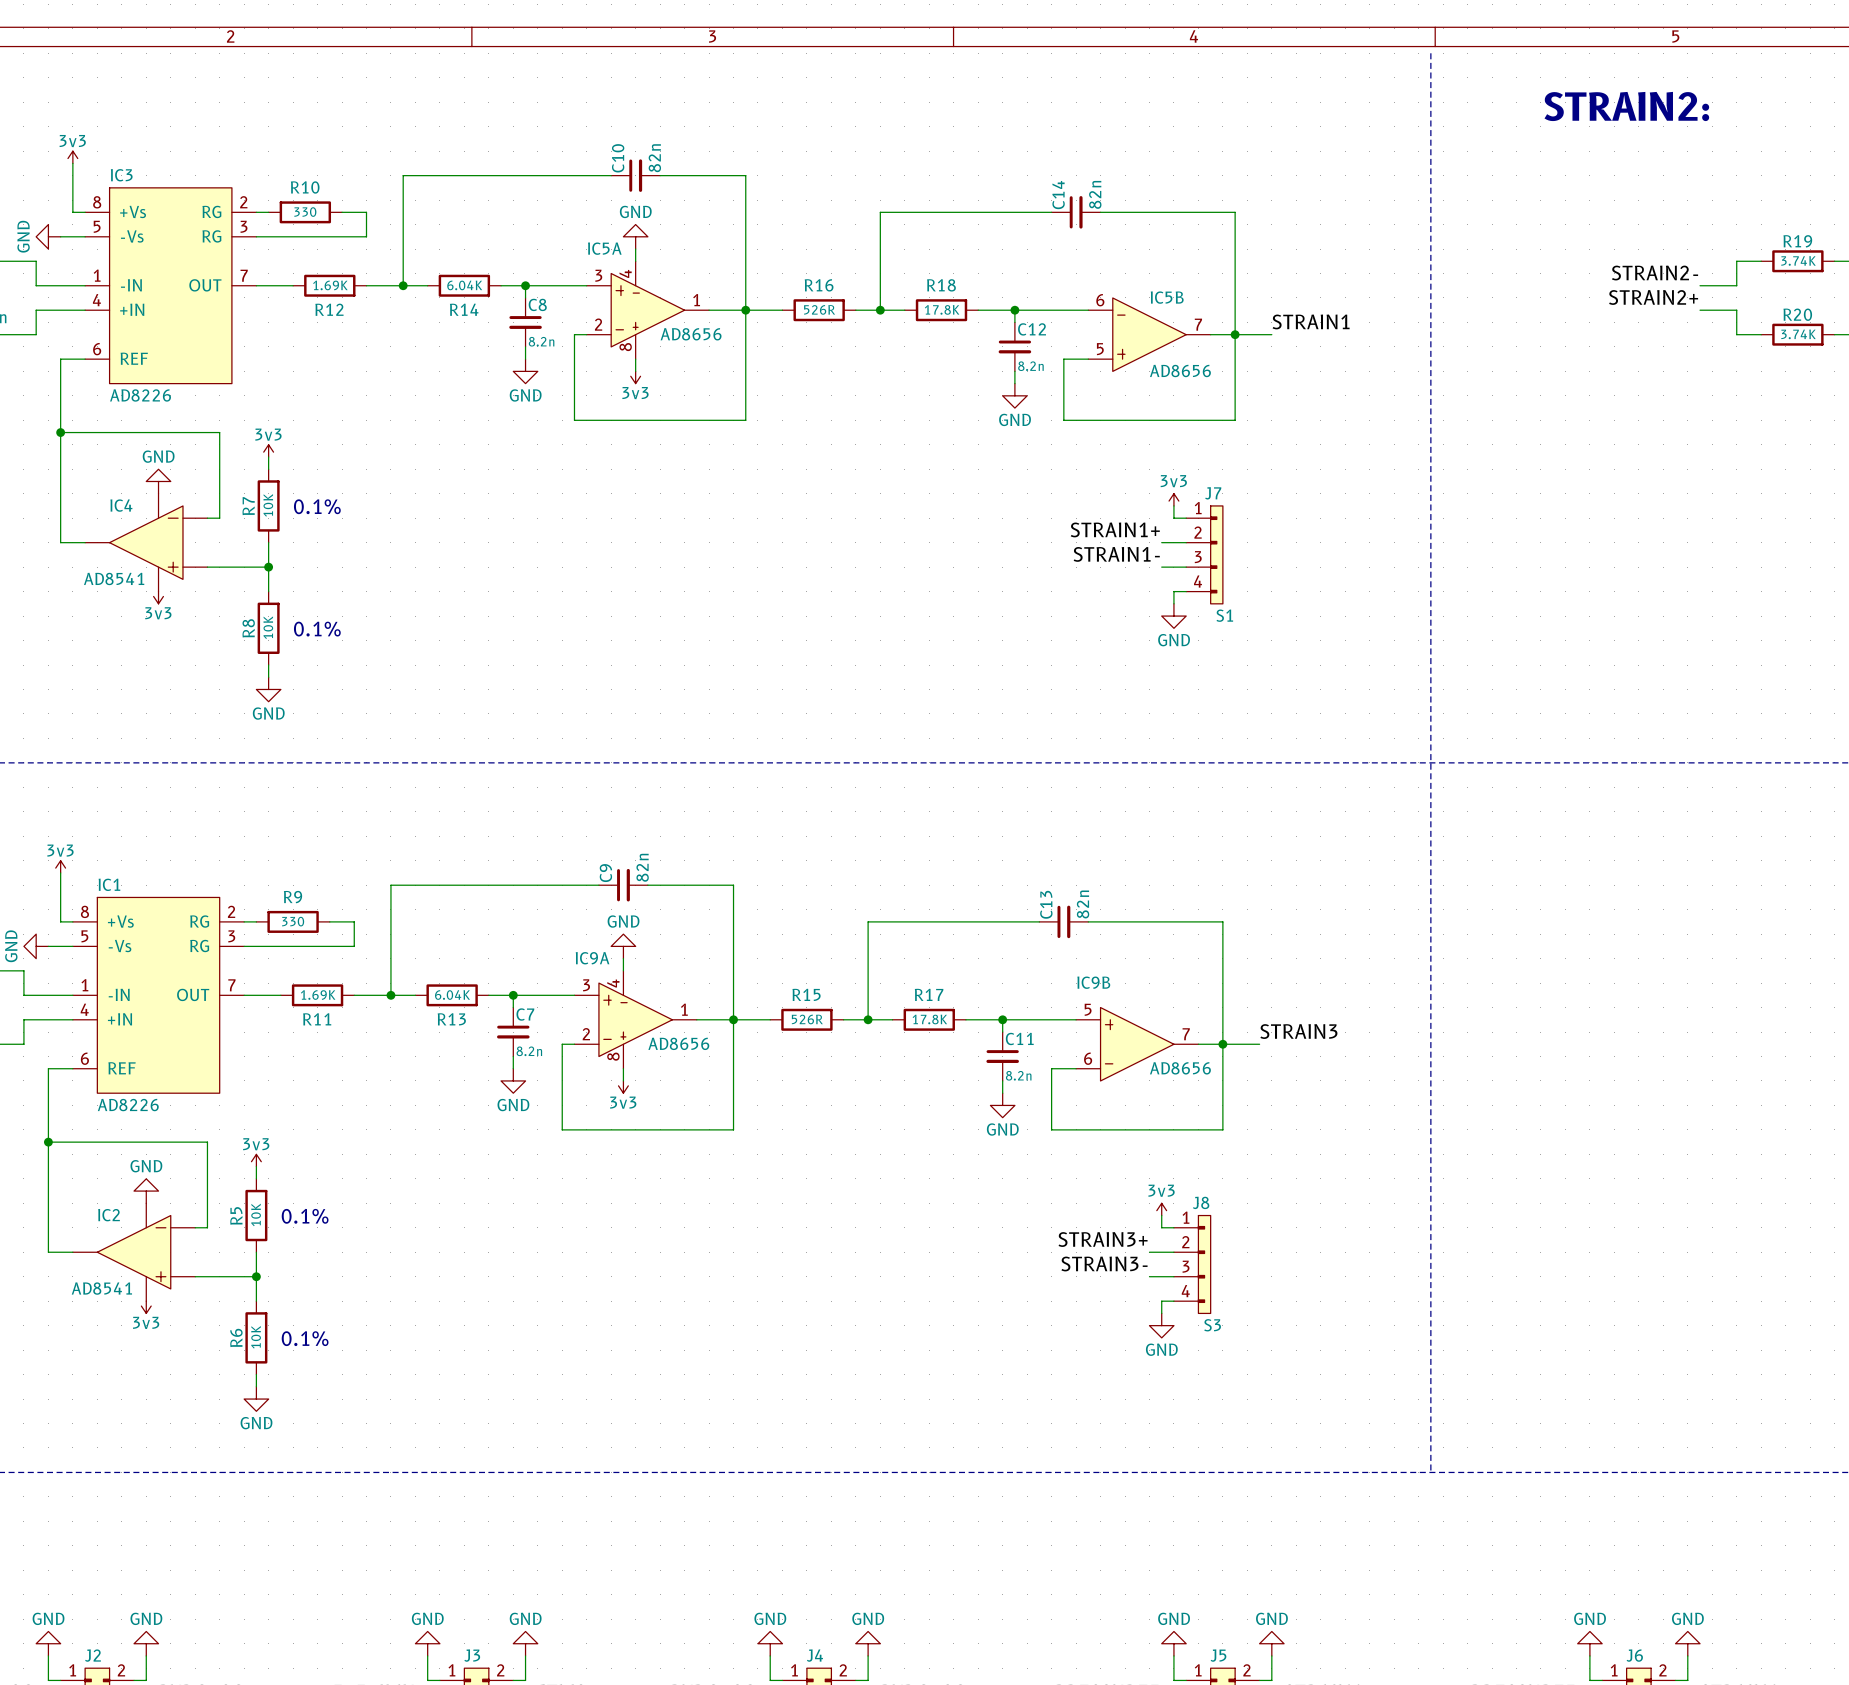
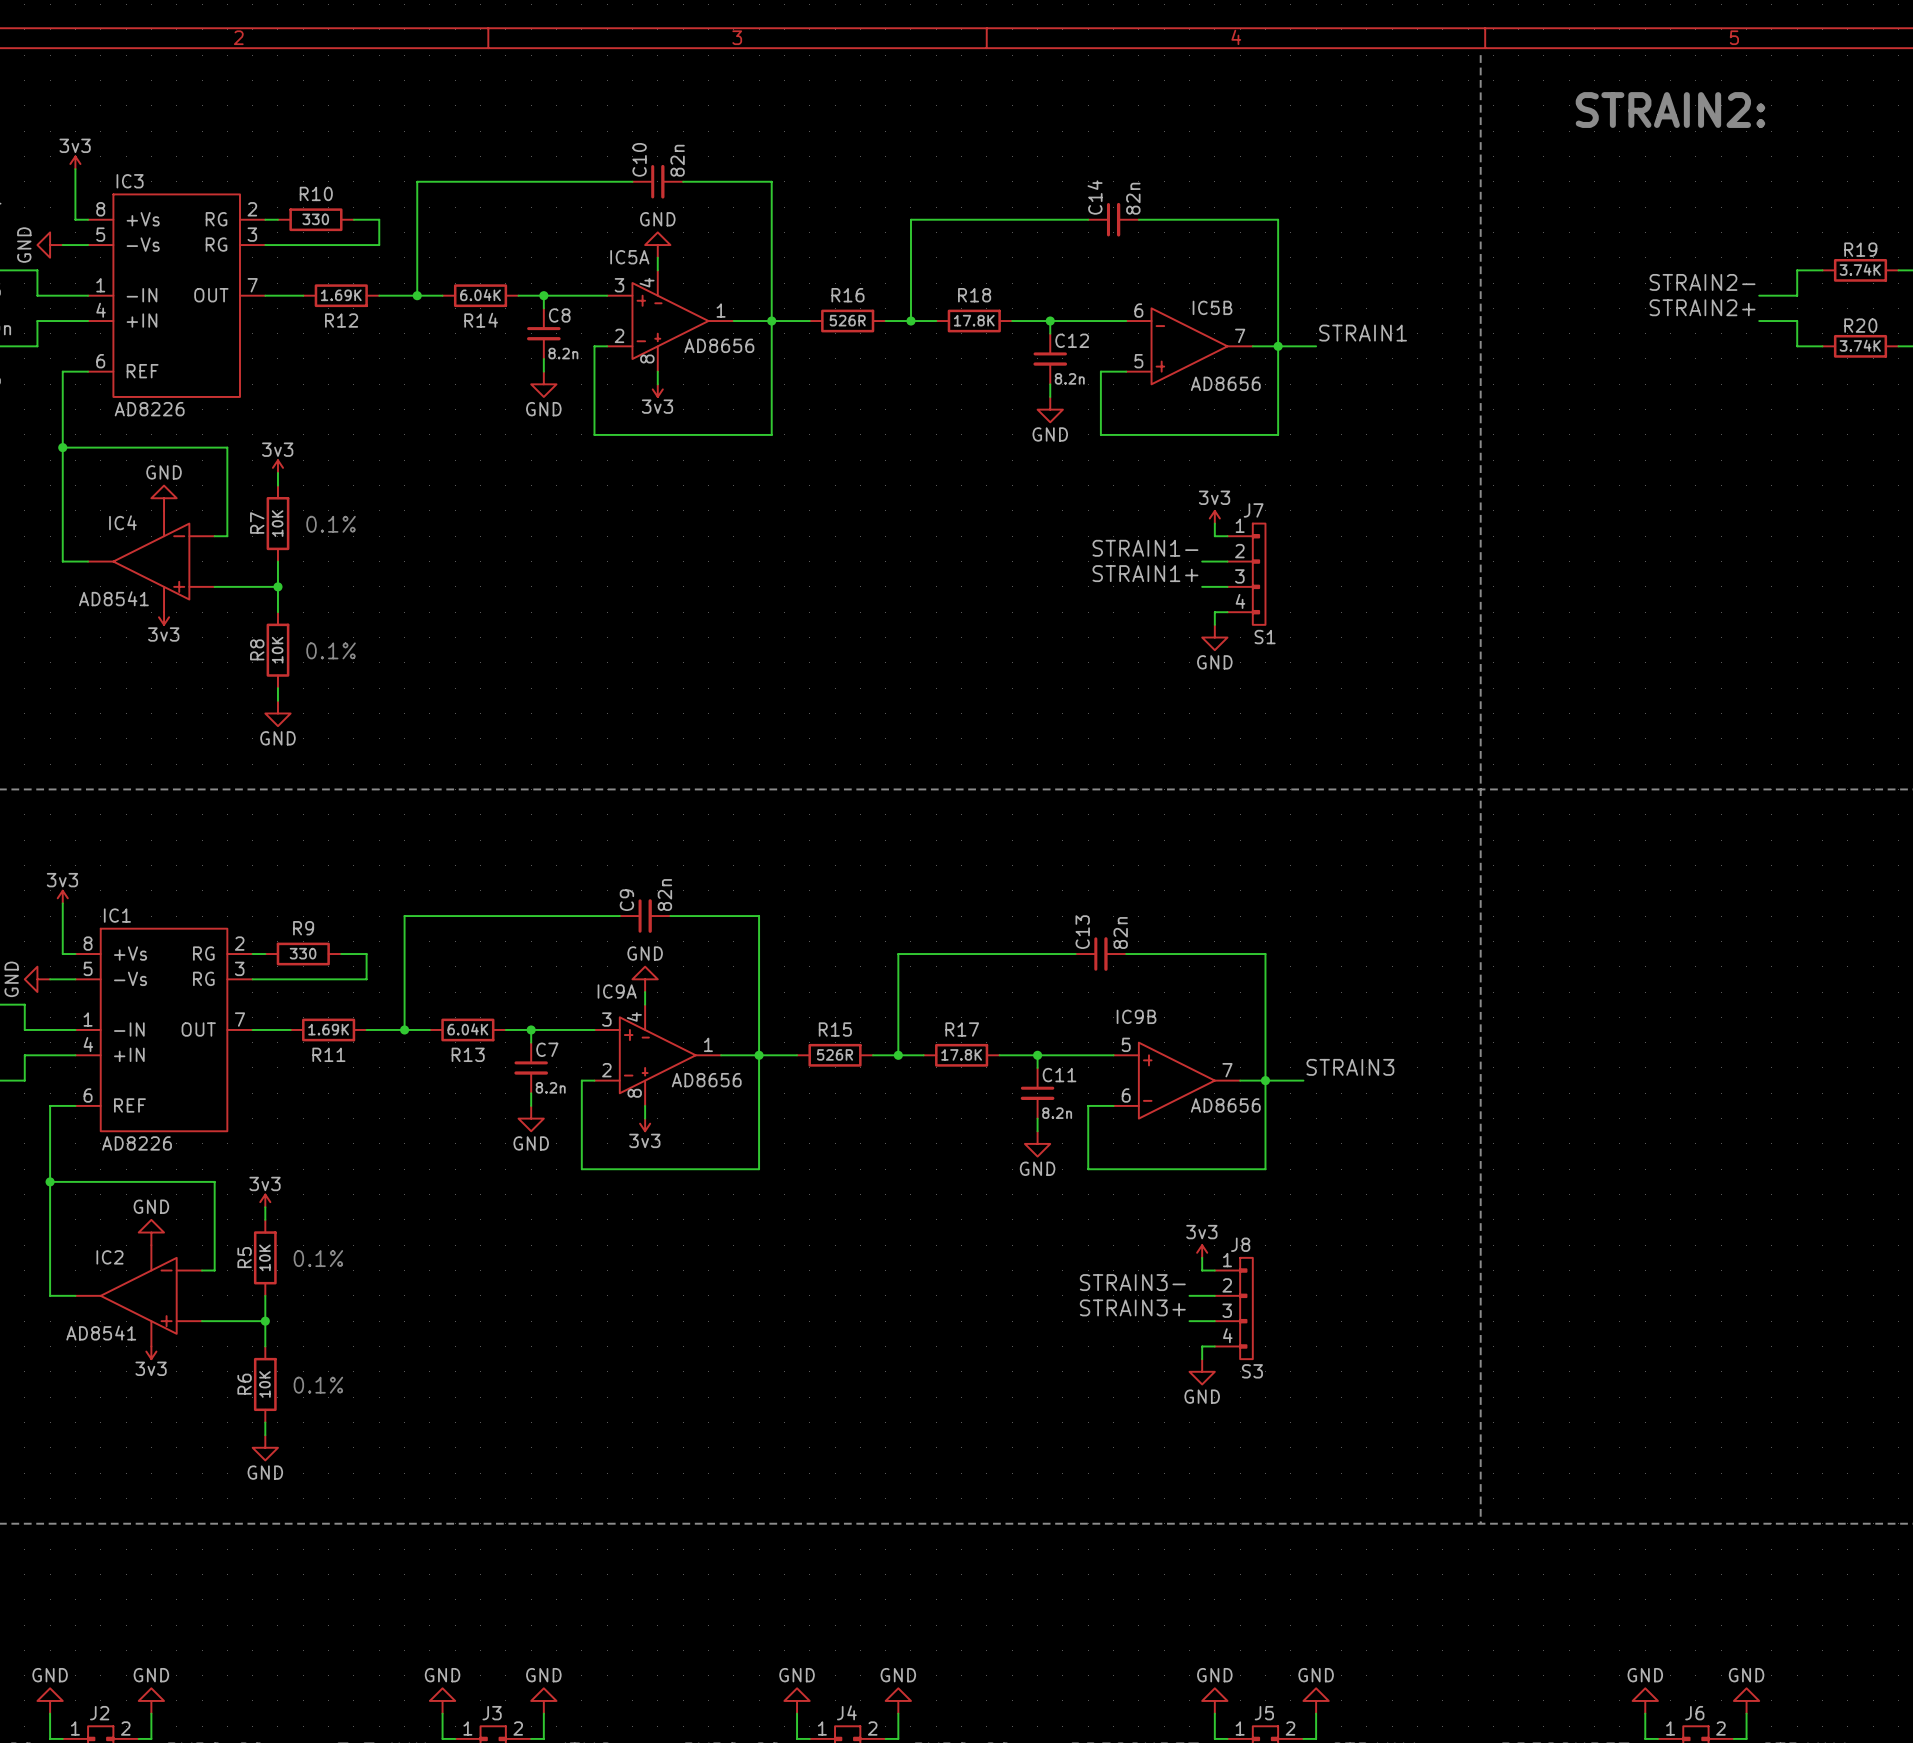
label: STRAIN1+ (1115, 529) -> STRAIN1- (1145, 548)
label: STRAIN1- (1116, 554) -> STRAIN1+ (1145, 573)
label: STRAIN3+ (1103, 1239) -> STRAIN3- (1132, 1282)
label: STRAIN3- (1104, 1263) -> STRAIN3+ (1132, 1307)

